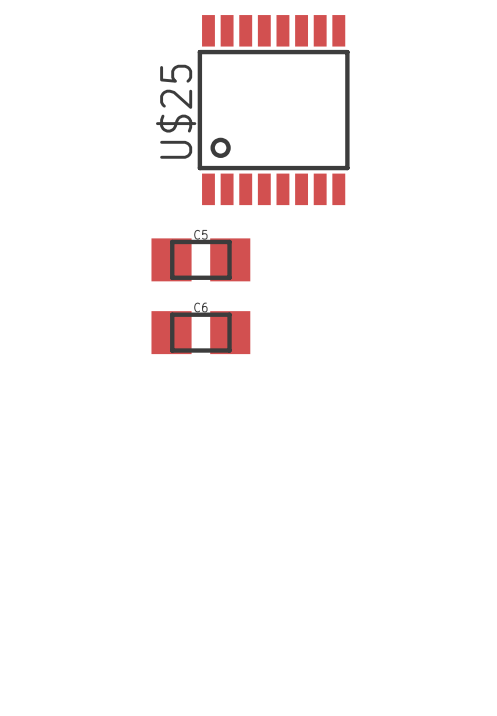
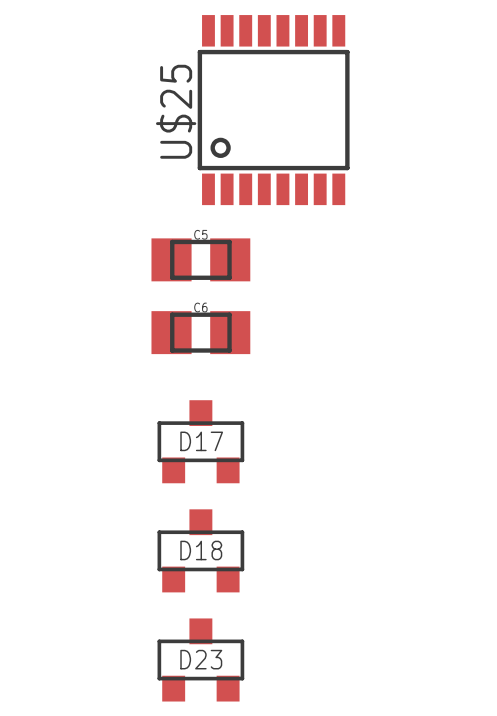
D17: none -> (200, 441)
D18: none -> (200, 550)
D23: none -> (200, 659)

